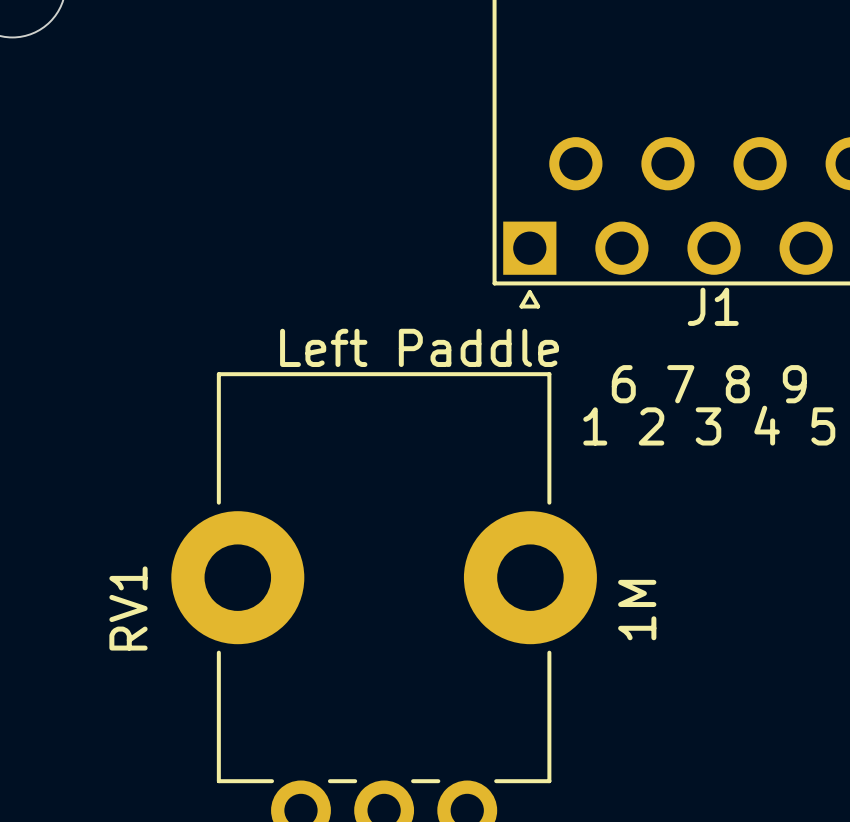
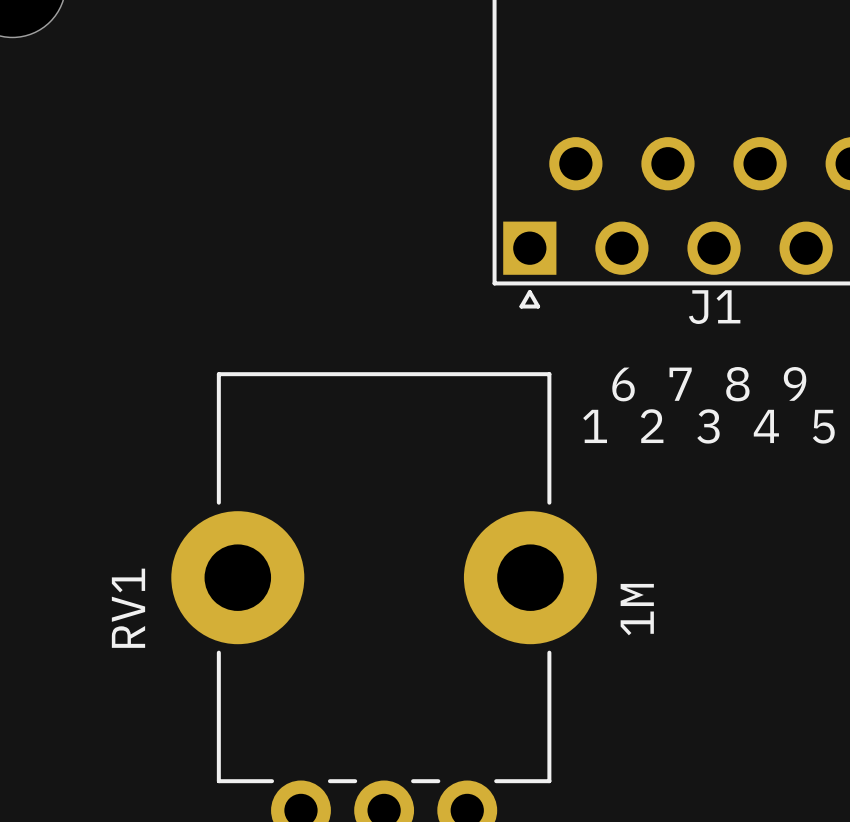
text: Left Paddle (419, 347) -> none

